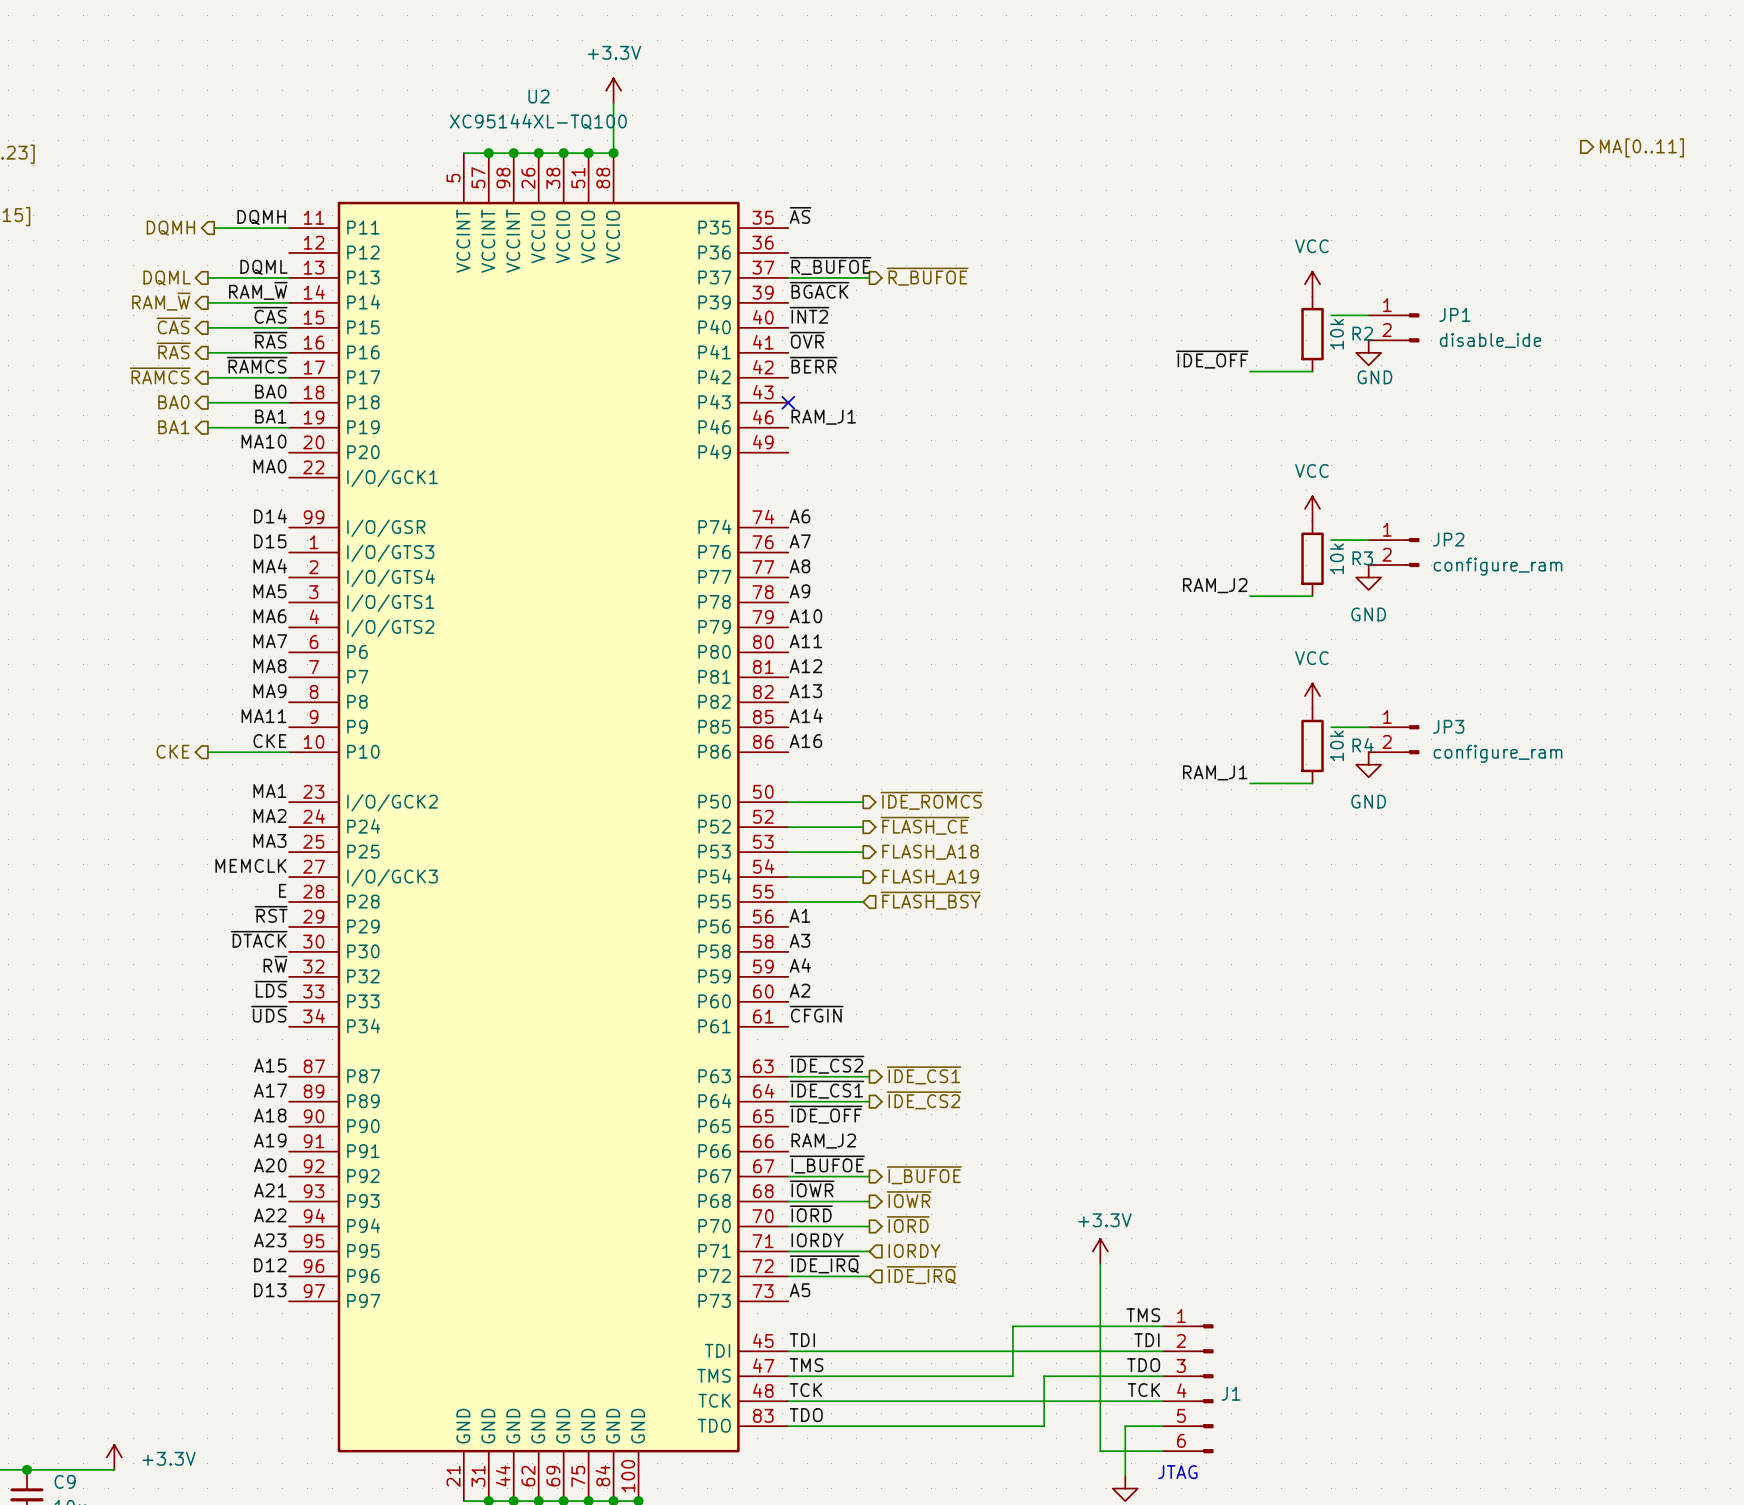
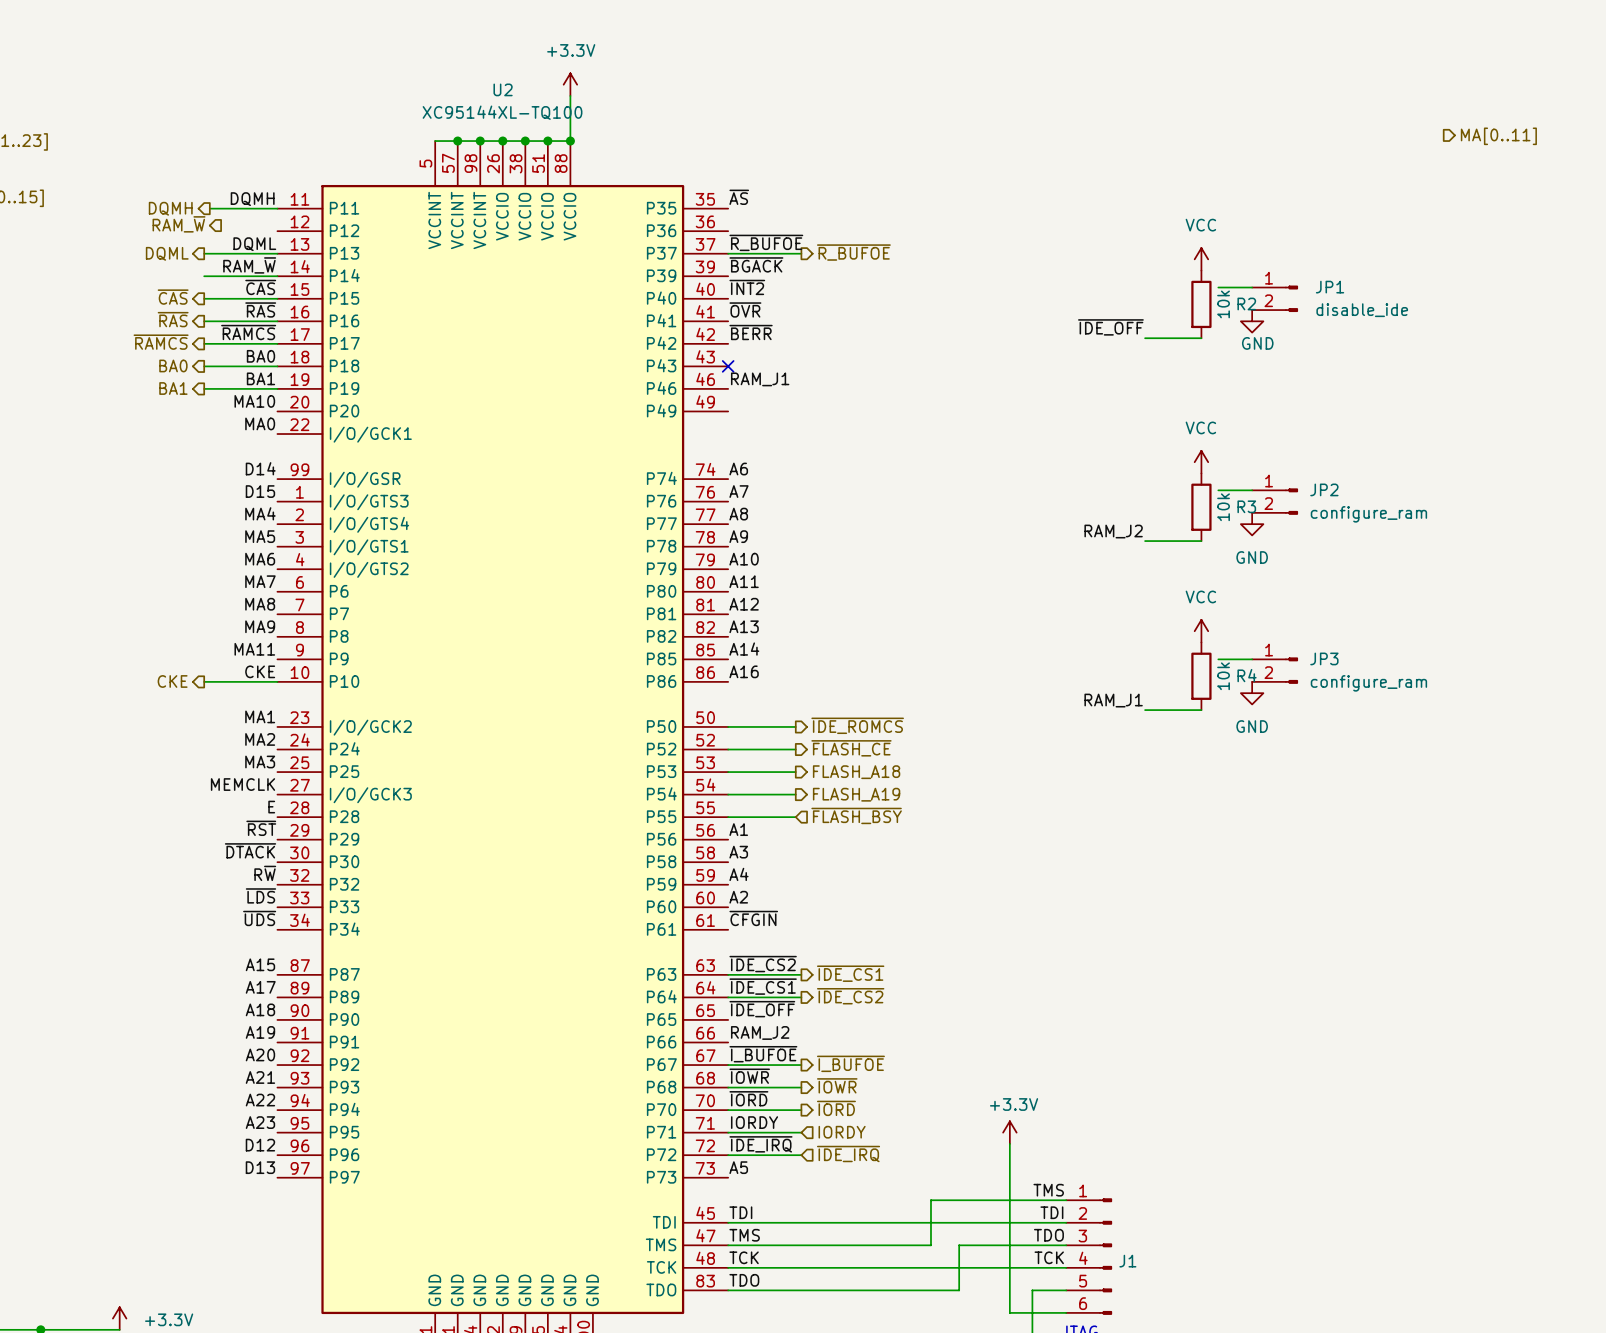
hierarchical label position: RAM_~{W} (161, 301) -> RAM_~{W} (179, 224)

